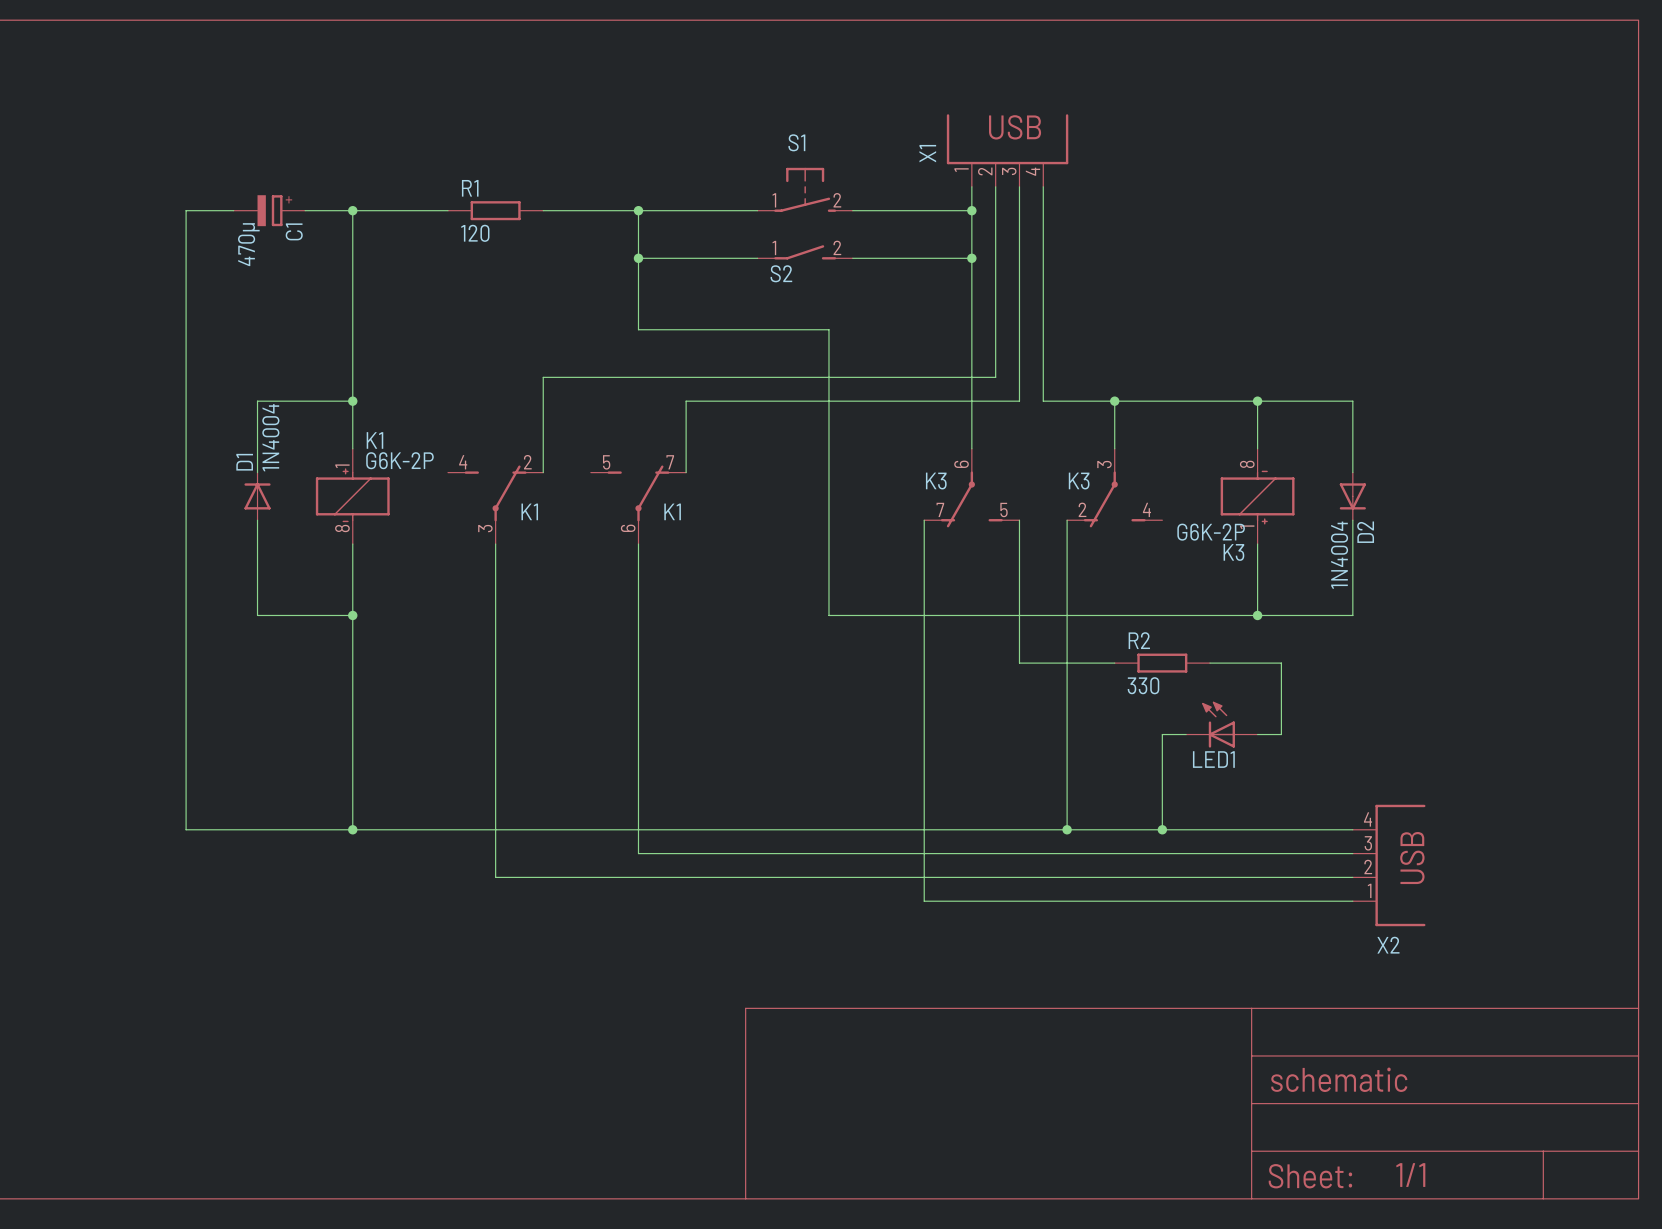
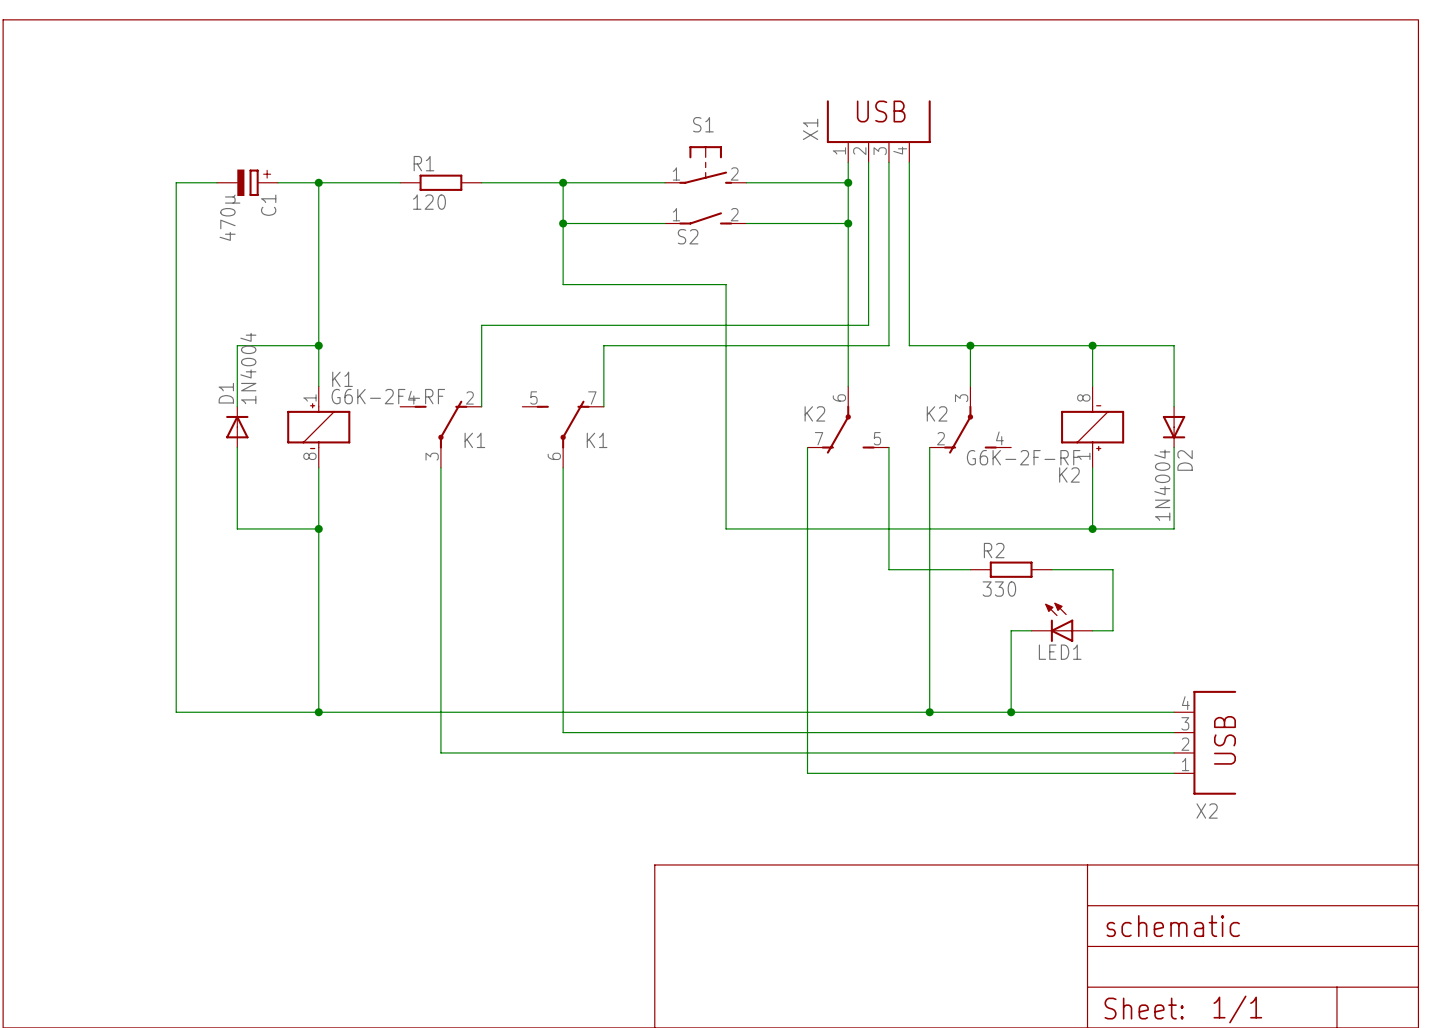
K1 value: G6K-2P (399, 460) -> G6K-2F-RF (388, 396)
K3 name: K3 (936, 481) -> K2 (814, 413)
K3 name: K3 (1079, 481) -> K2 (937, 413)
K3 value: G6K-2P (1211, 532) -> G6K-2F-RF (1023, 457)
K3 name: K3 (1233, 552) -> K2 (1069, 475)

